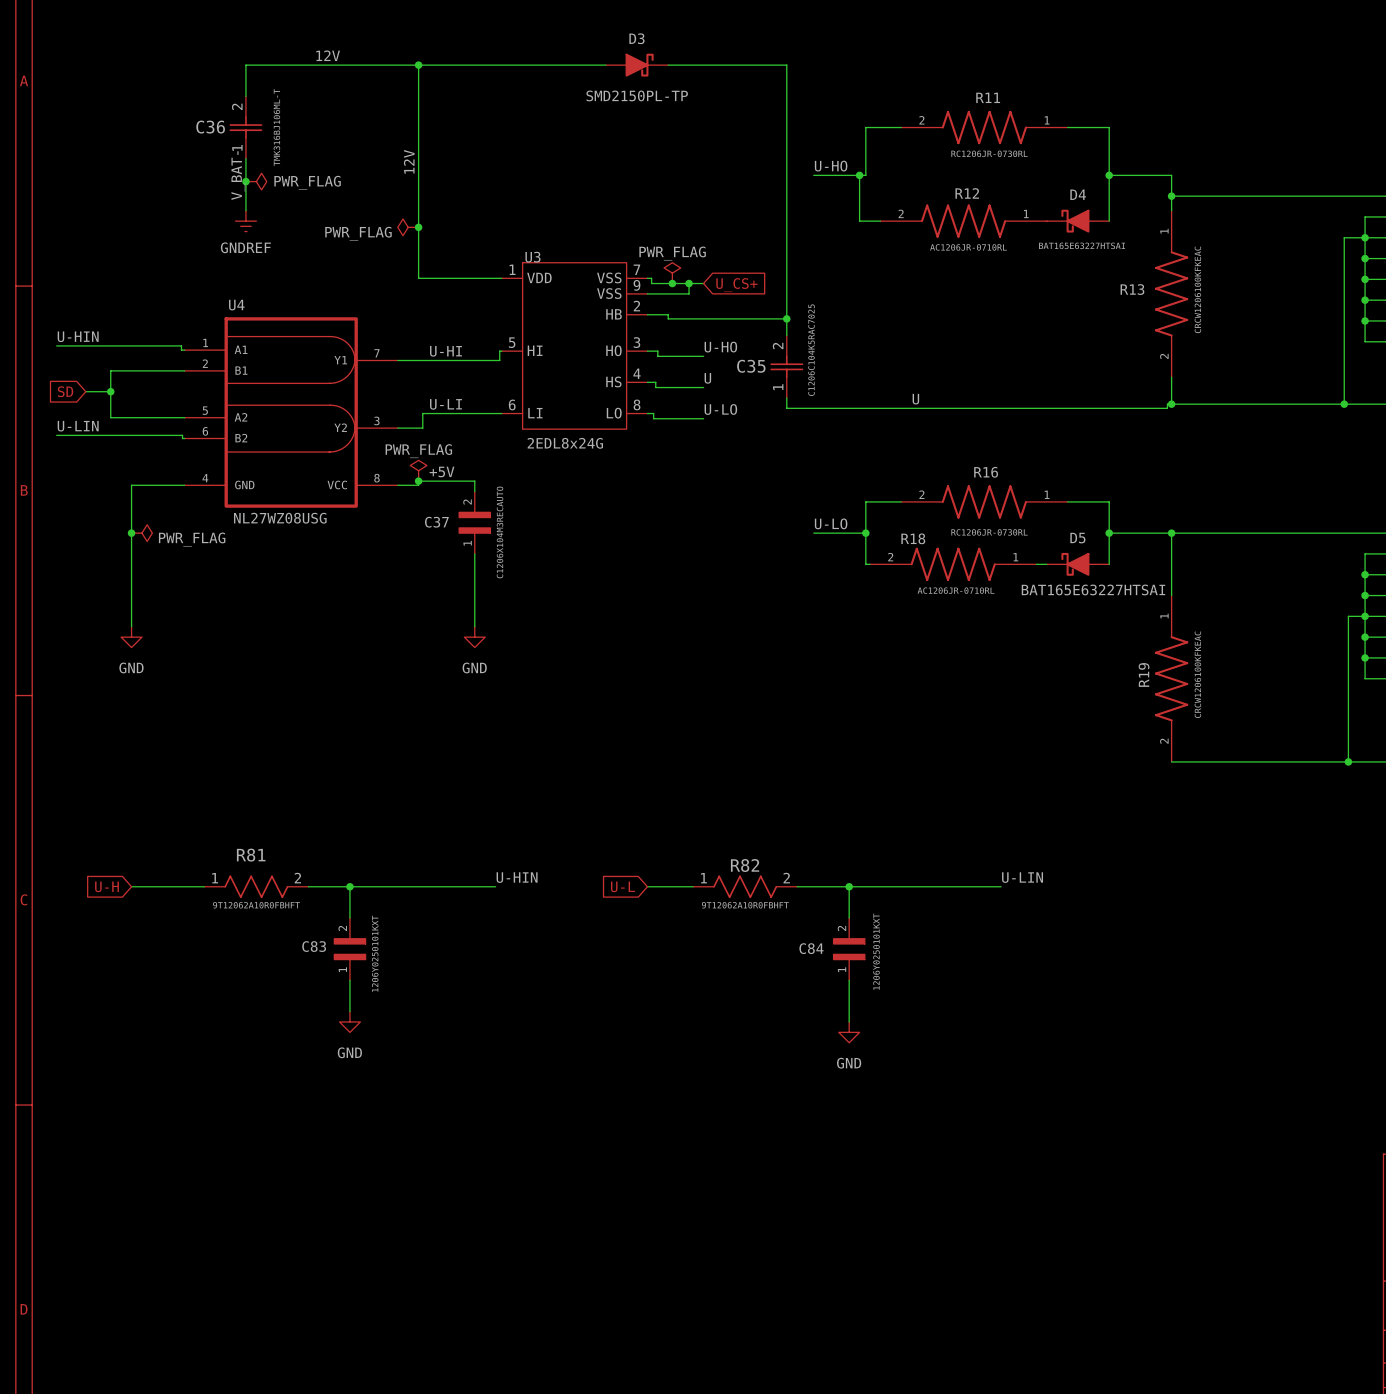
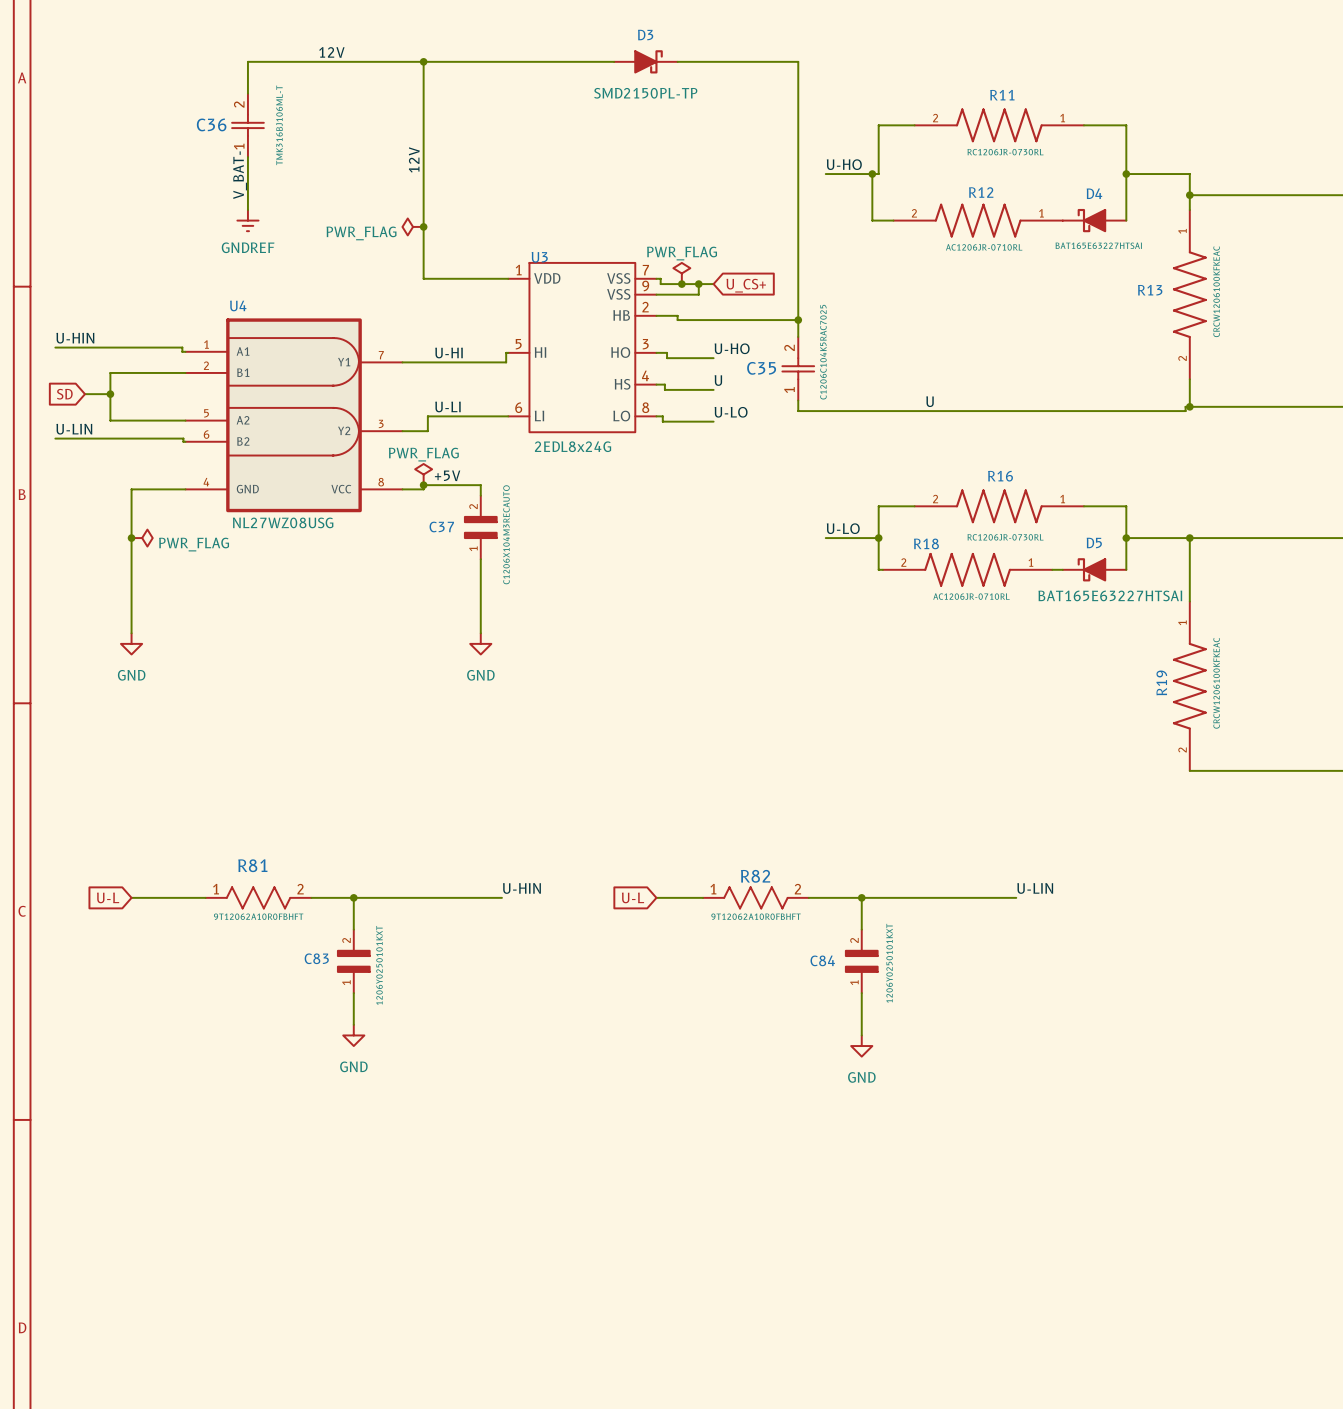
junction: (245, 181) -> none
power symbol: PWR_FLAG (256, 181) -> none
global label: U-H (107, 886) -> U-L (108, 897)

